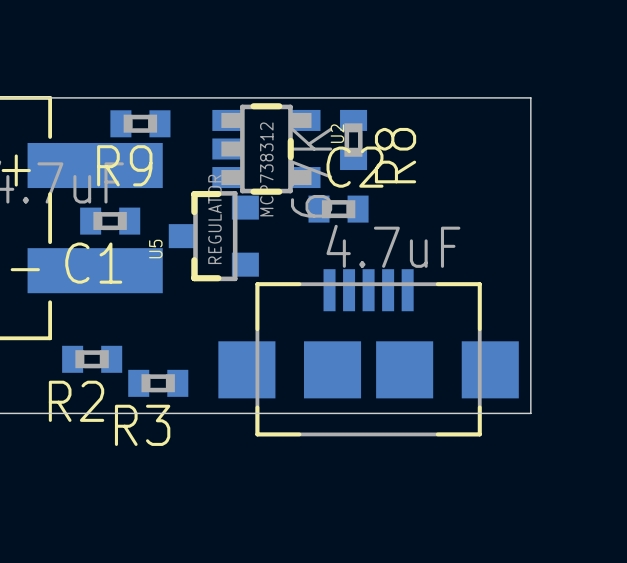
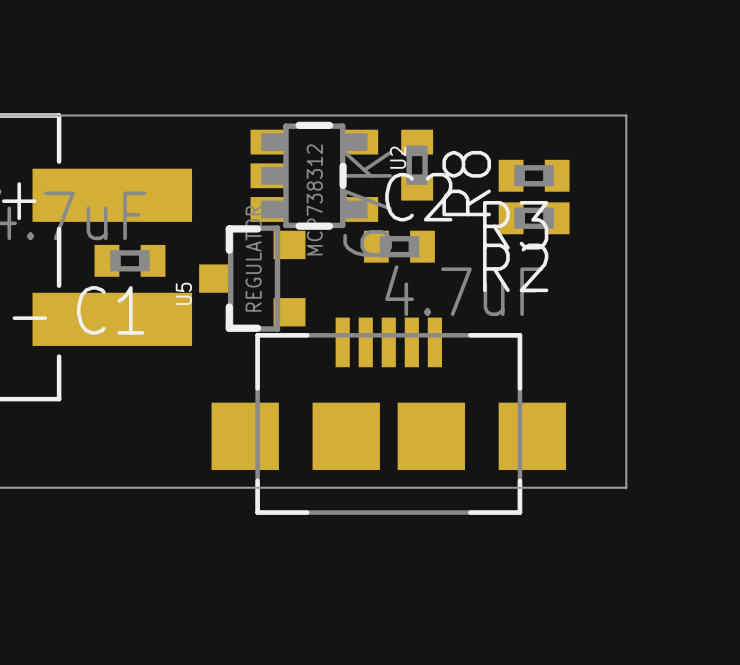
R9: (140, 123) -> none
part position: (368, 352) -> (388, 416)
R2 position: (92, 359) -> (534, 218)
R3 position: (158, 383) -> (534, 175)

